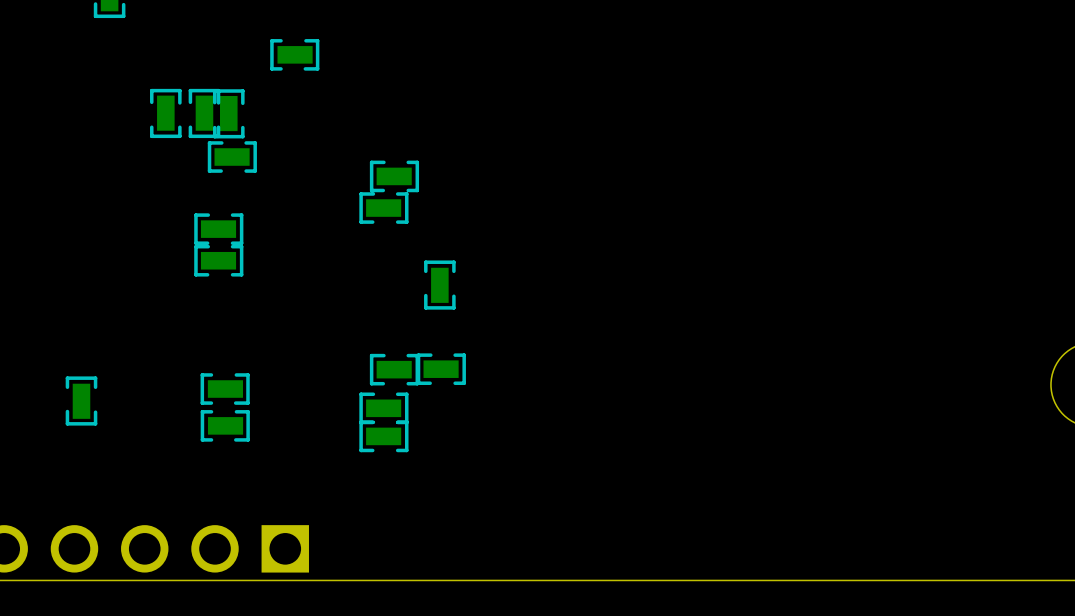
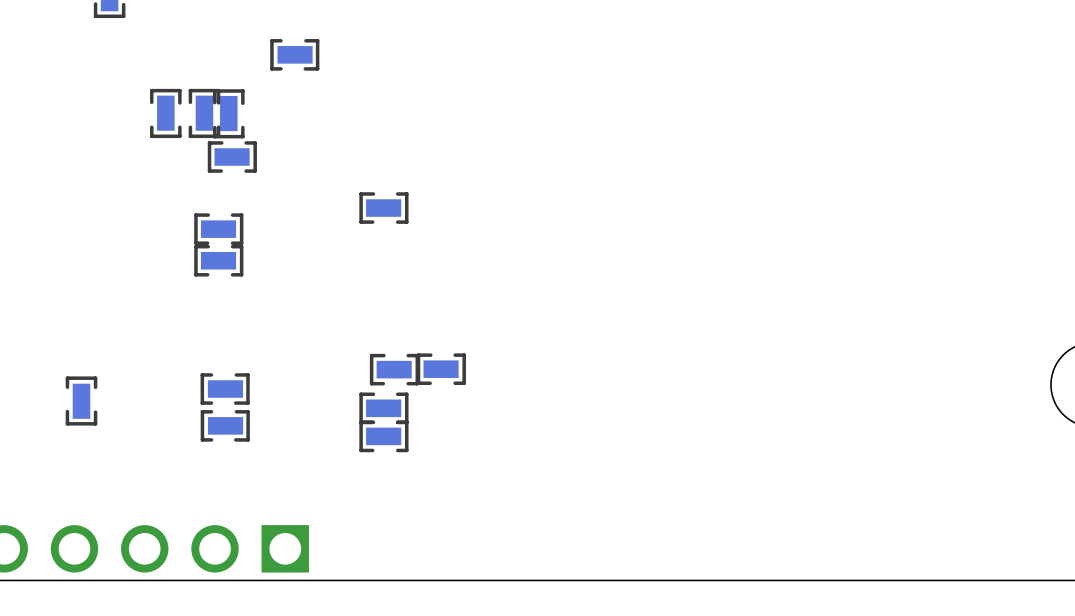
part: (394, 176) -> none
part: (439, 285) -> none

